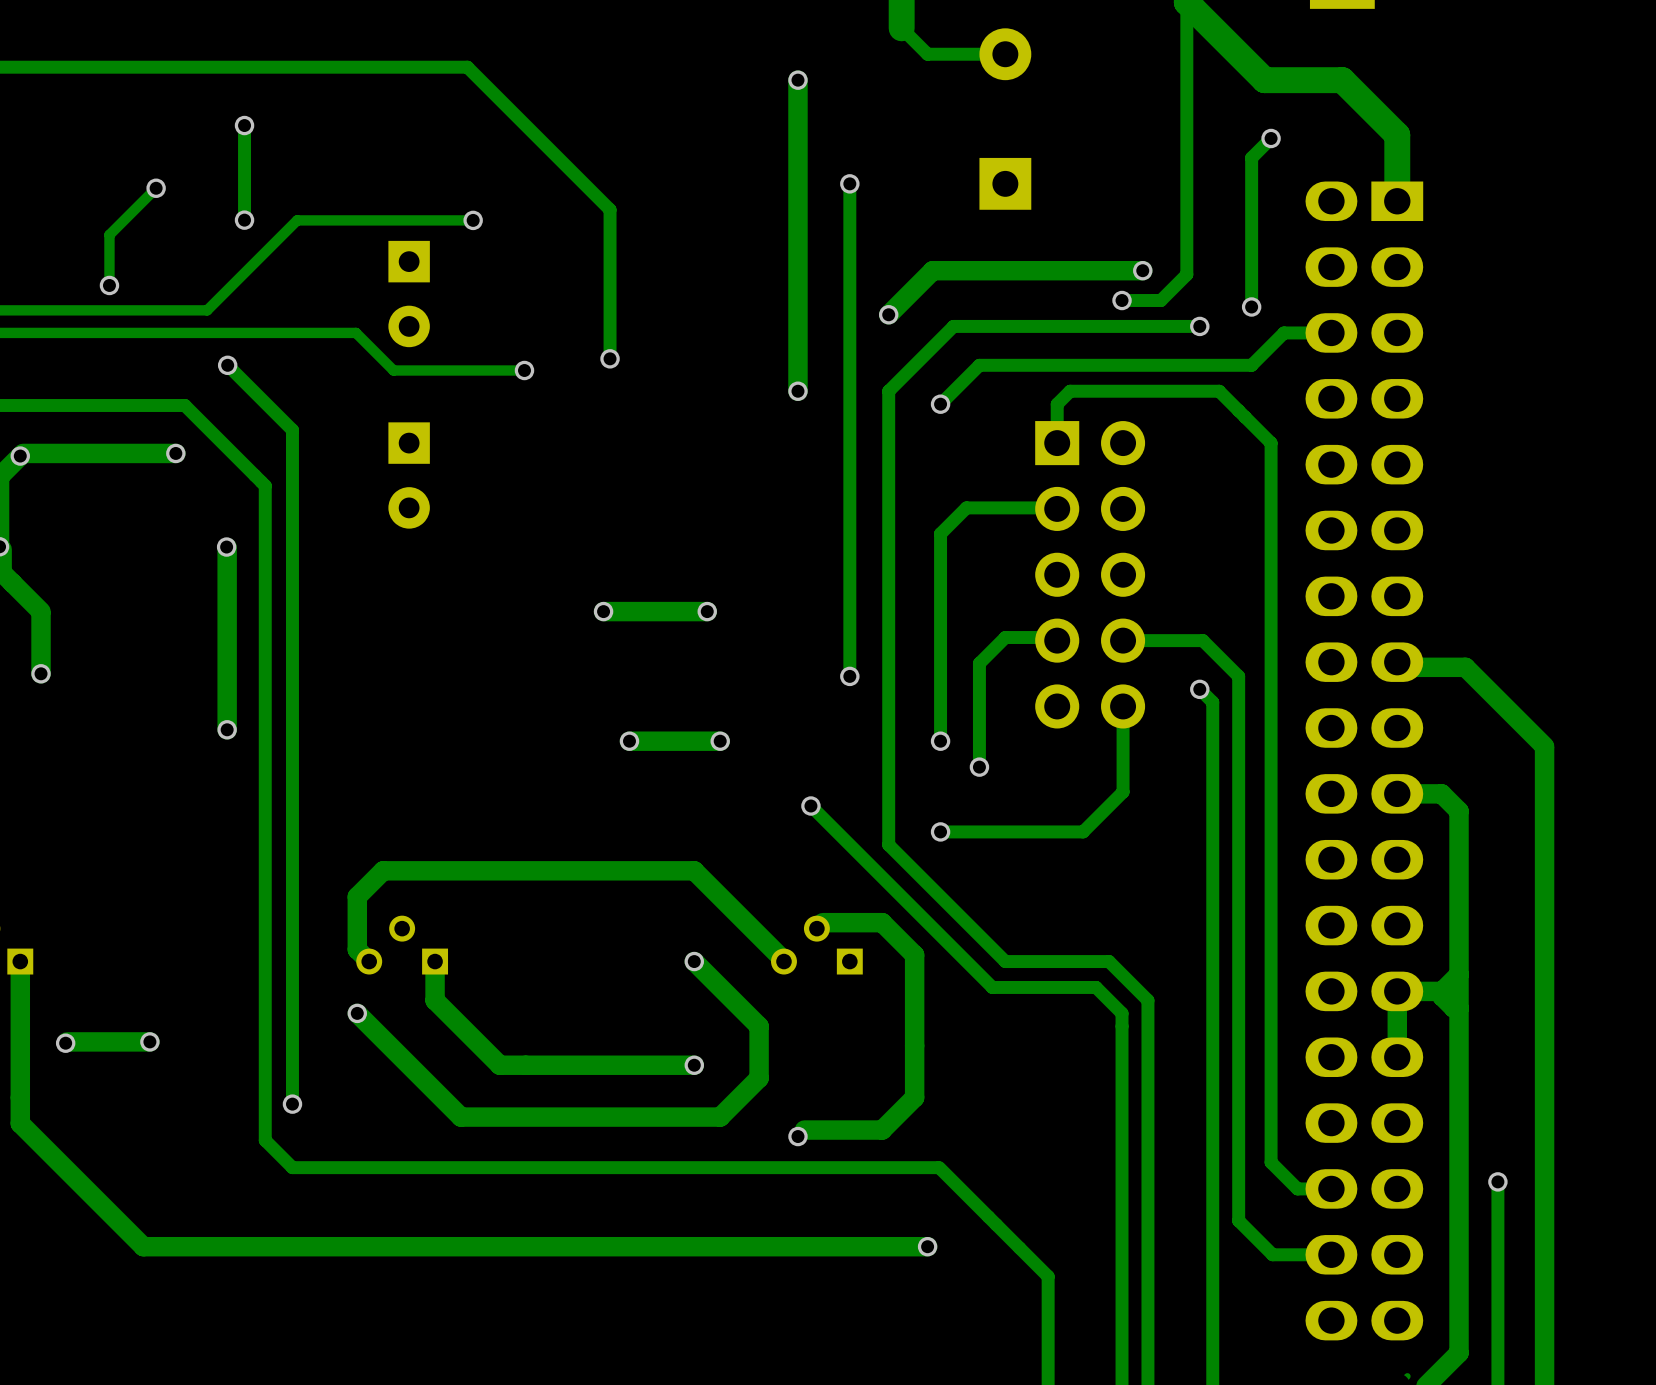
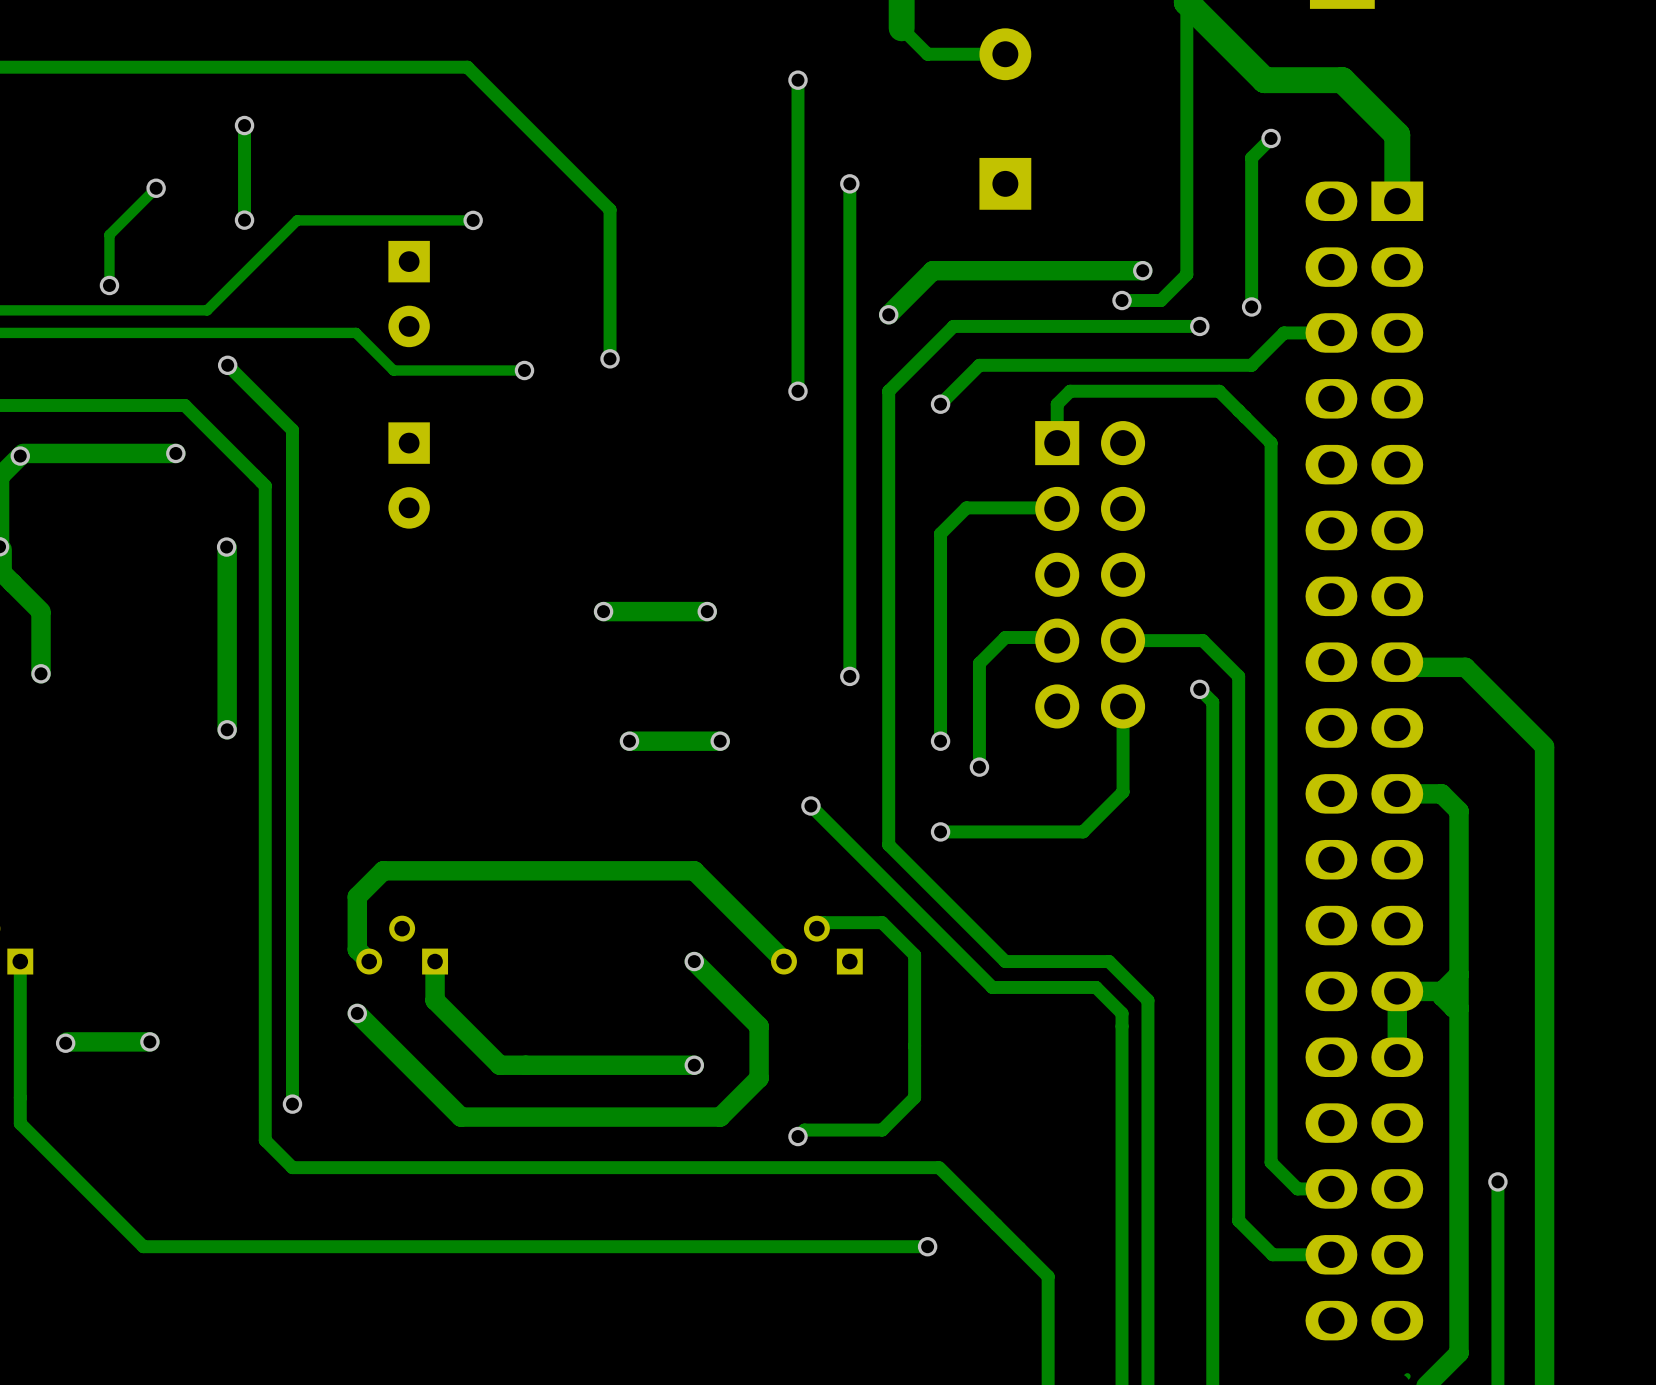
track width: thick (797, 80) (797, 391) -> thin (797, 80) (797, 391)
track width: thick (822, 922) (882, 922) (914, 955) (914, 1097) (882, 1130) (804, 1130) -> thin (822, 922) (882, 922) (914, 955) (914, 1097) (882, 1130) (804, 1130)
track width: thick (20, 961) (20, 1123) (143, 1246) (927, 1246) -> thin (20, 961) (20, 1123) (143, 1246) (927, 1246)

